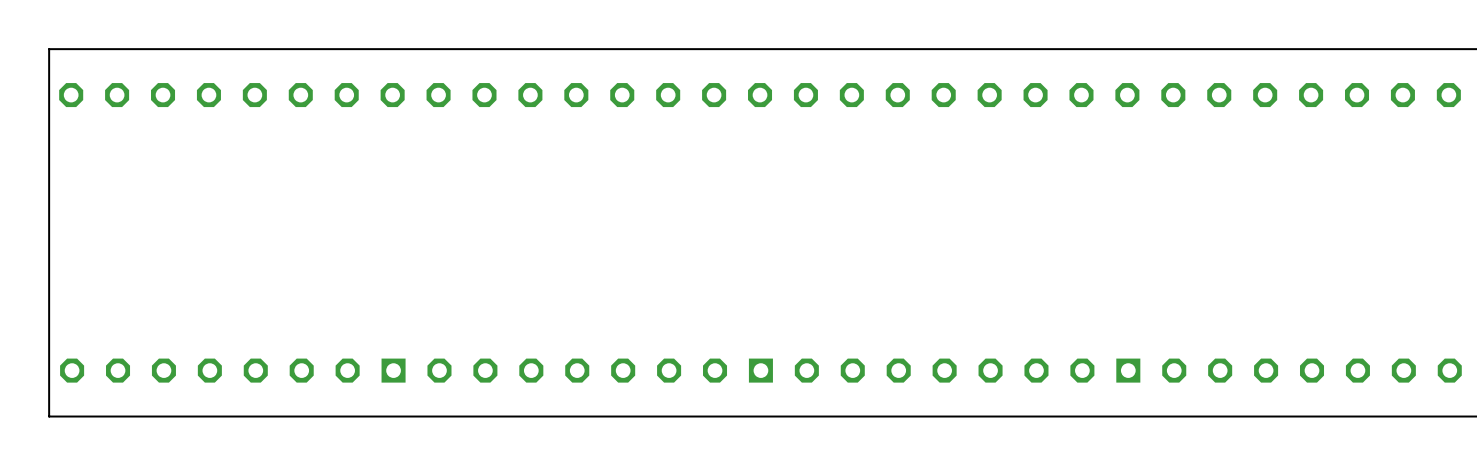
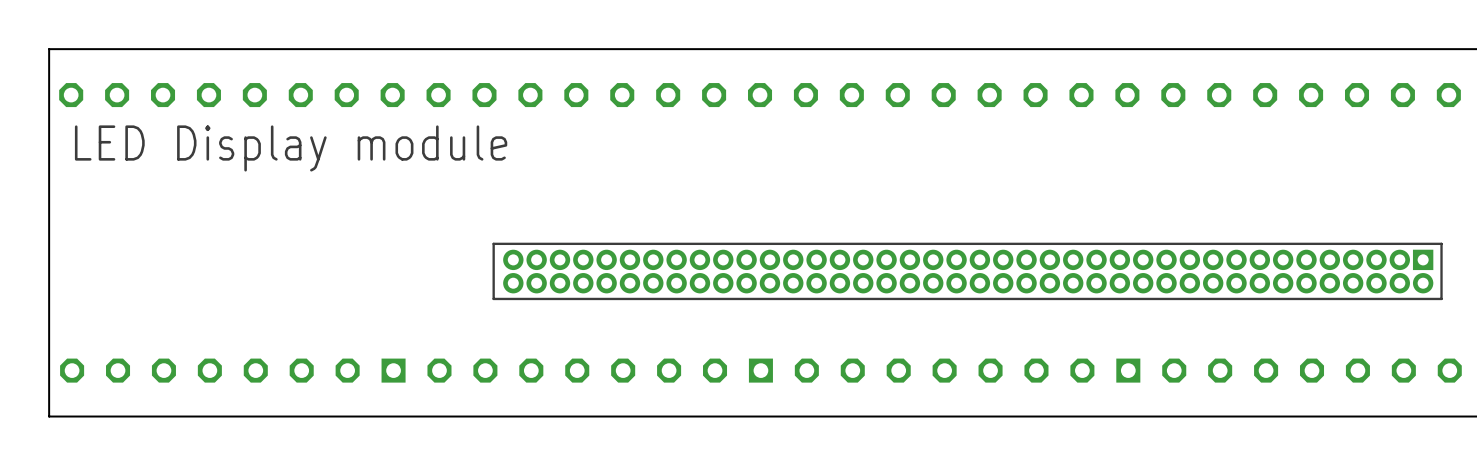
text: none -> LED Display module (291, 148)
part: none -> (967, 271)

